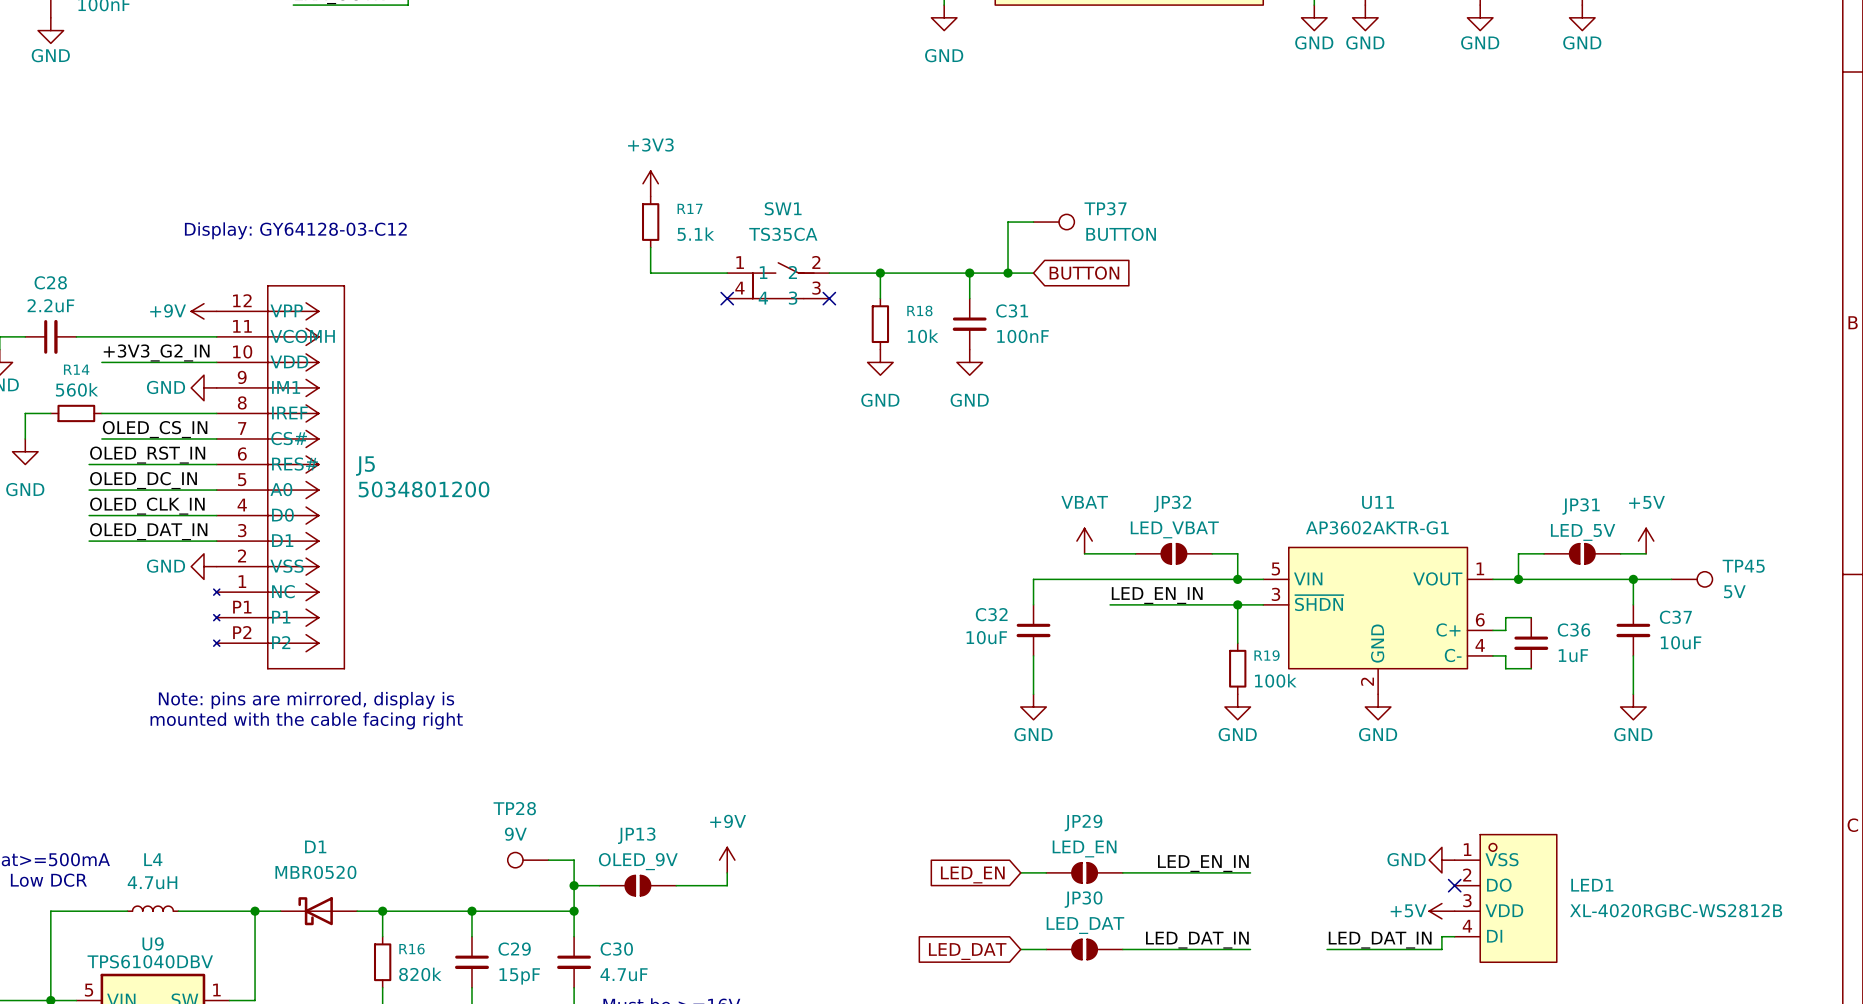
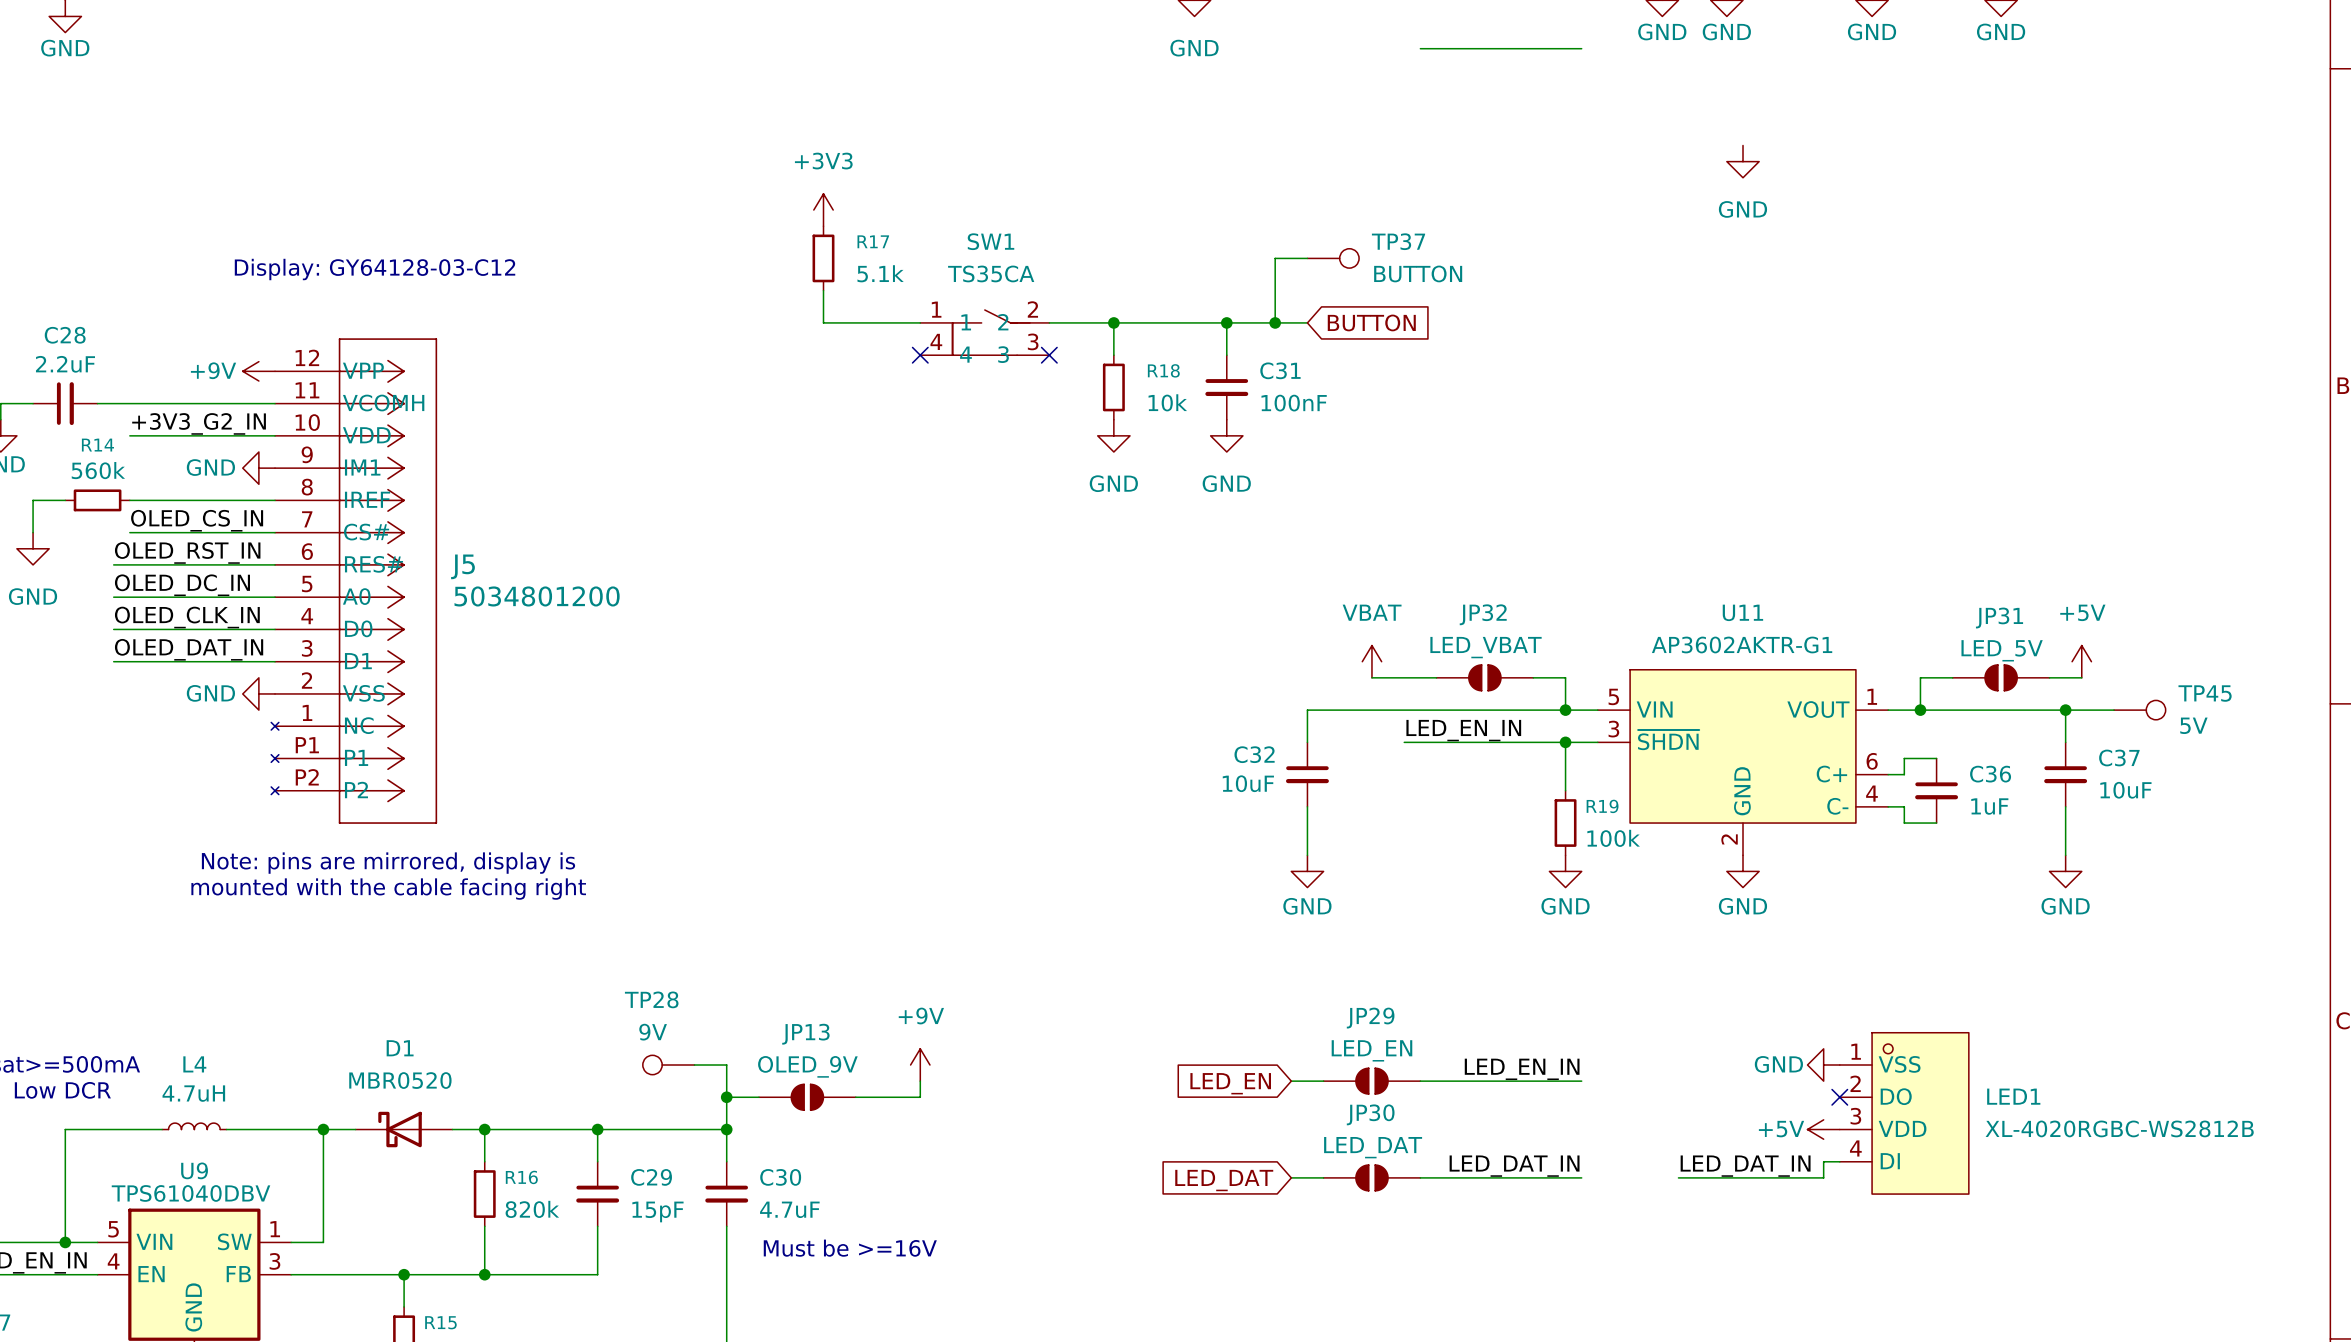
wire: none -> (1420, 48) (1581, 48)
power symbol: none -> GND (1743, 161)

